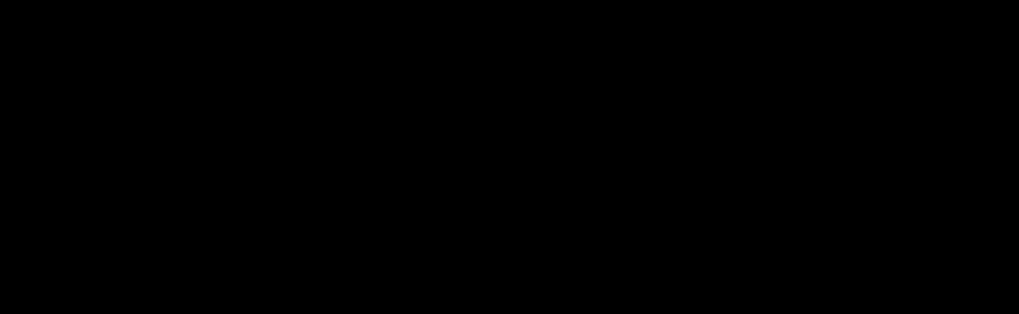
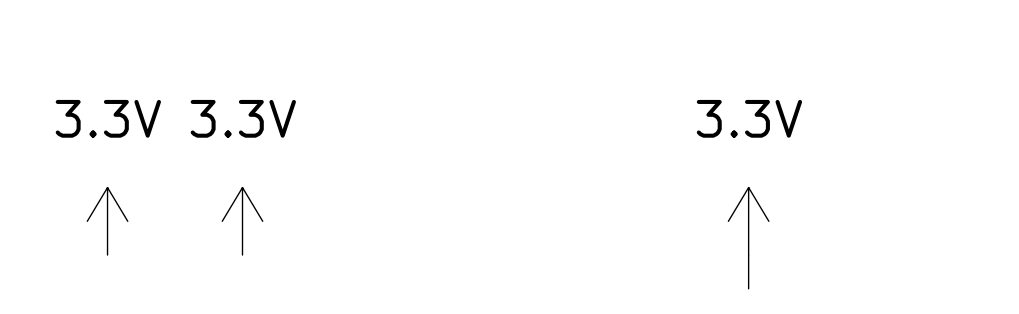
power symbol: none -> 3.3V (107, 221)
power symbol: none -> 3.3V (242, 221)
power symbol: none -> 3.3V (748, 221)
wire: none -> (748, 255) (748, 288)

